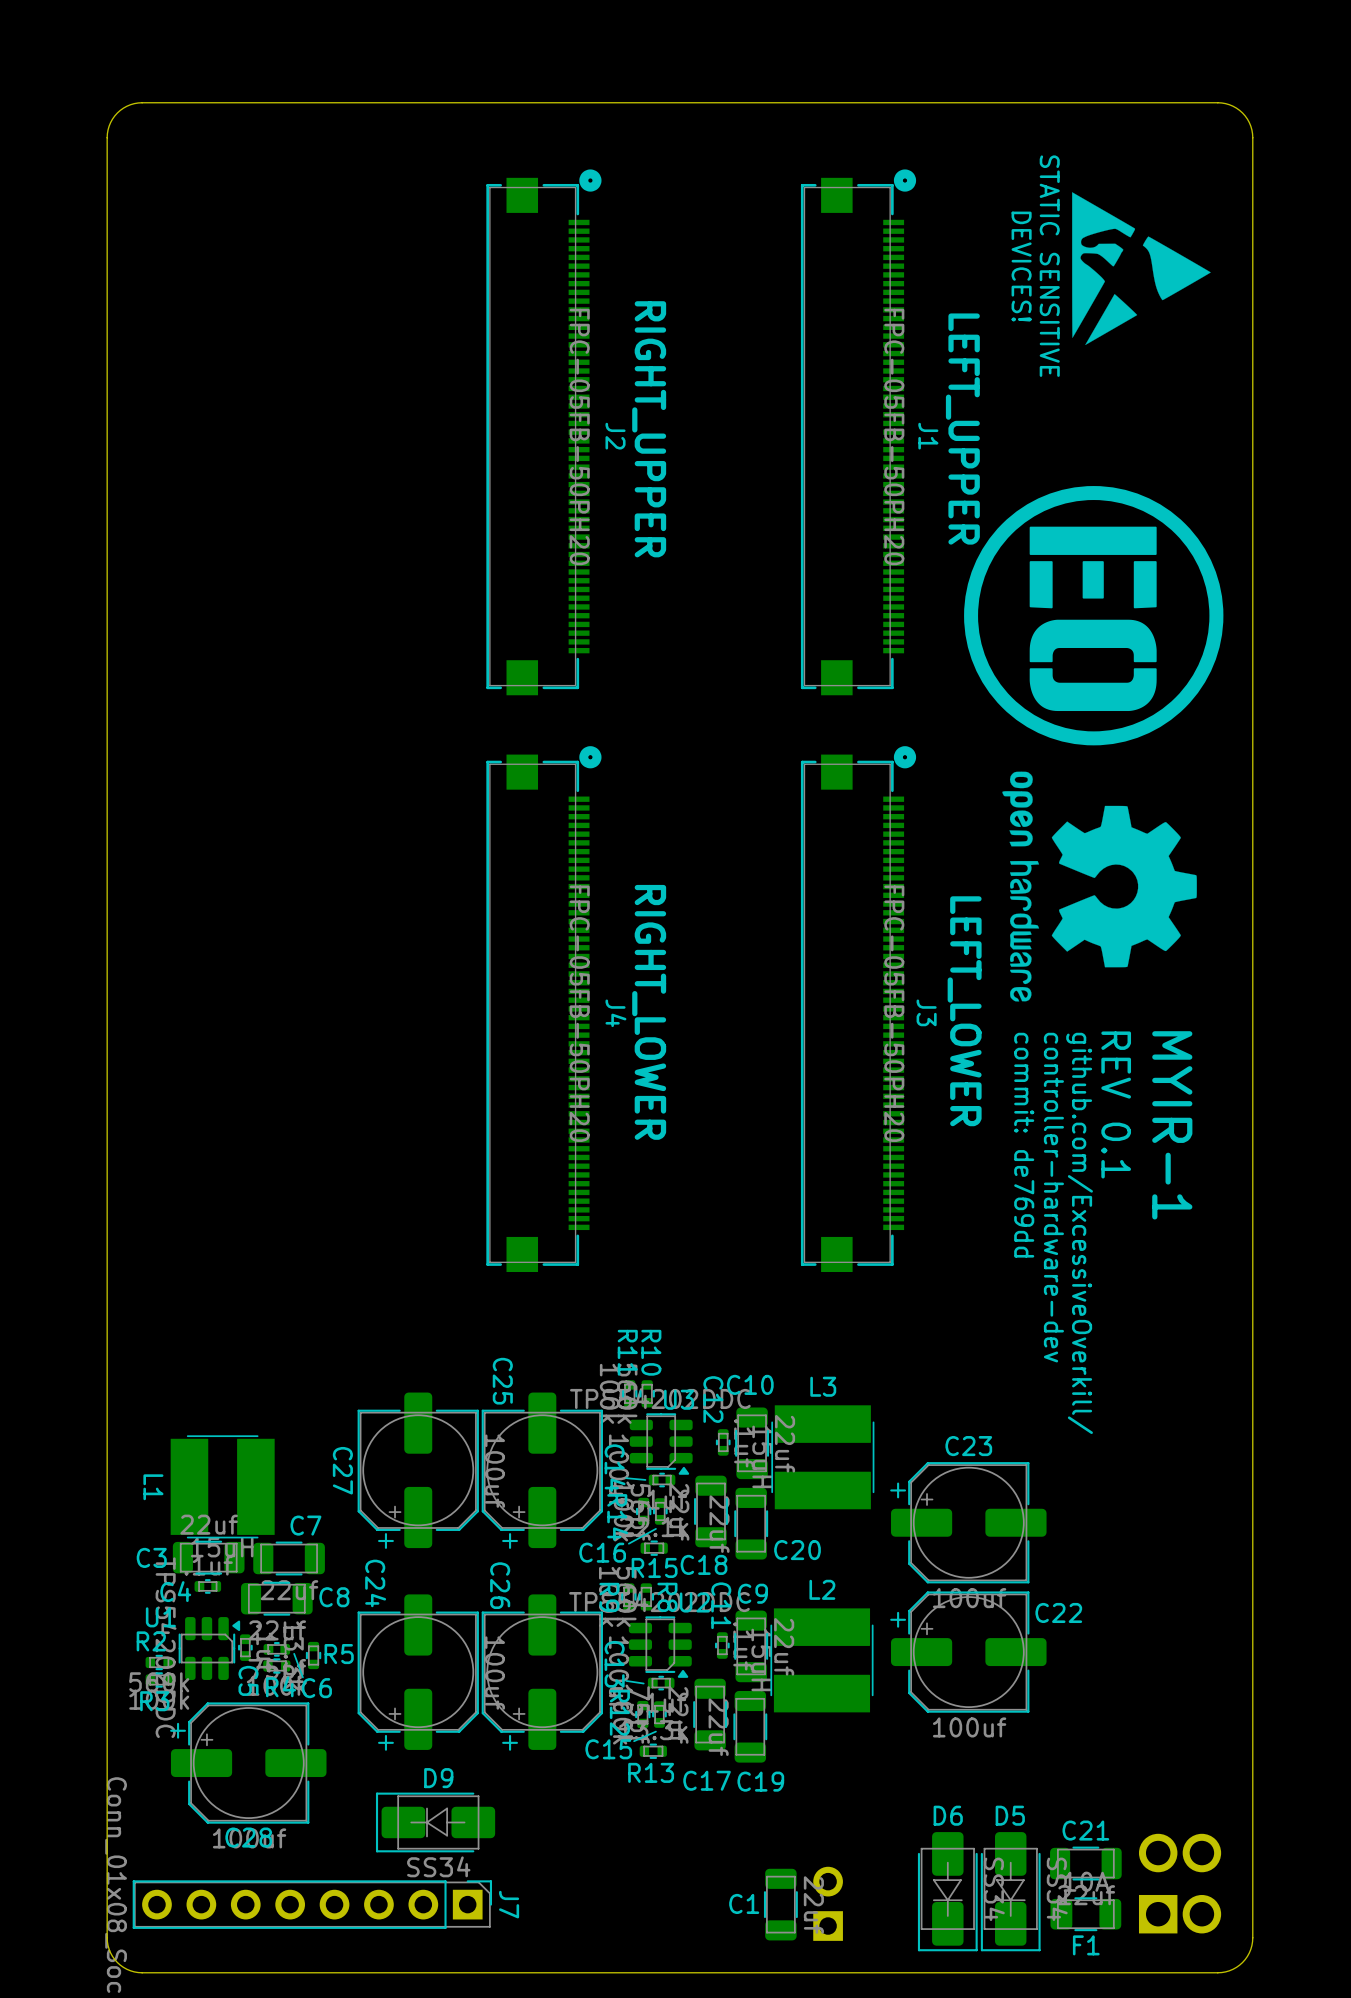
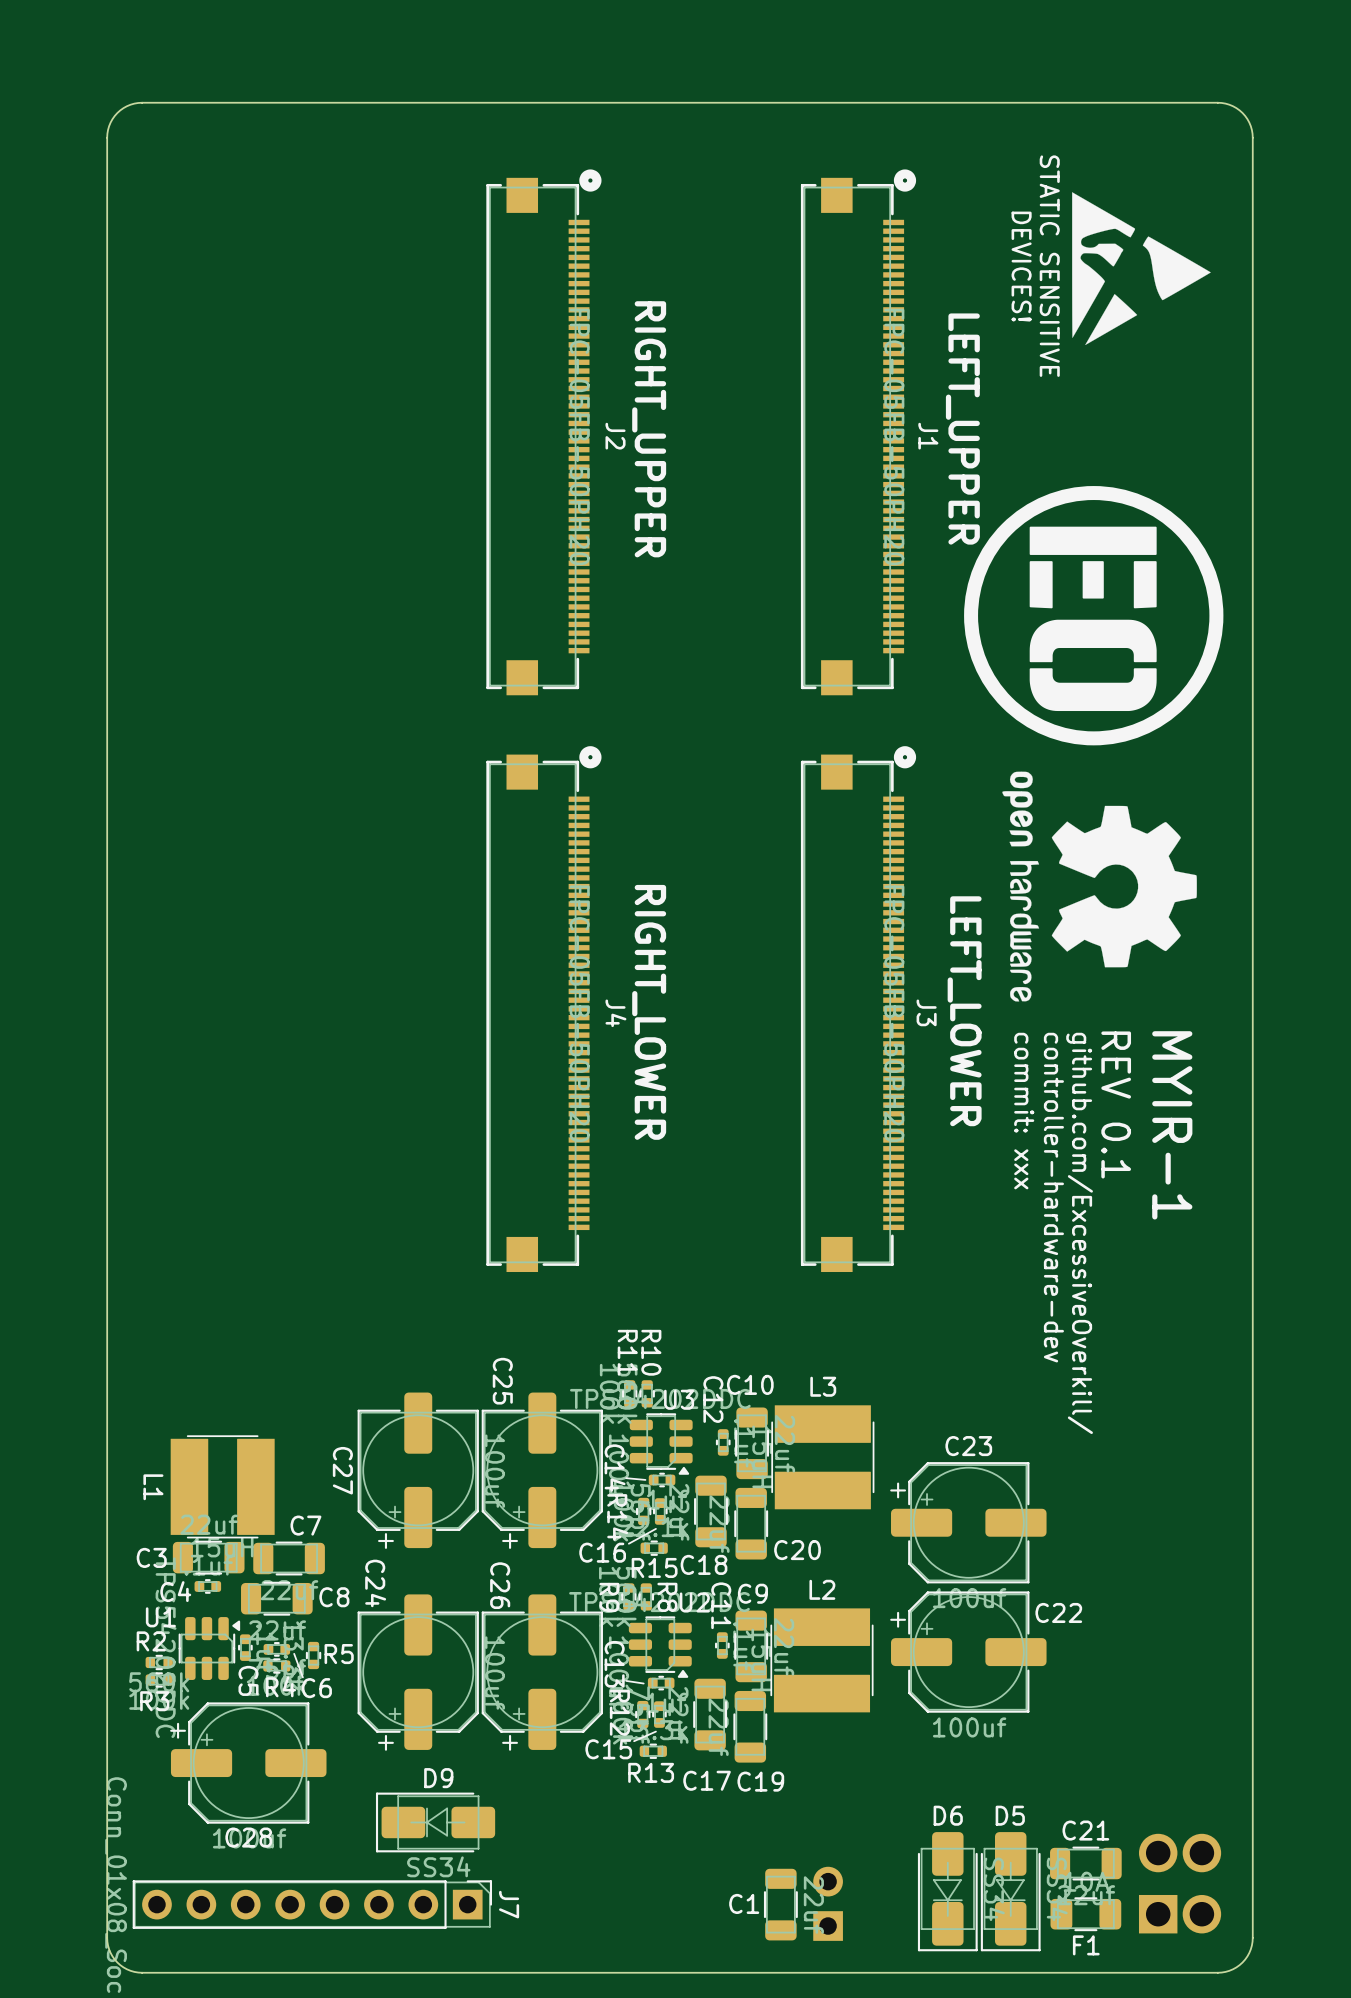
text: commit: de769dd (1024, 1145) -> commit: xxx (1024, 1111)

